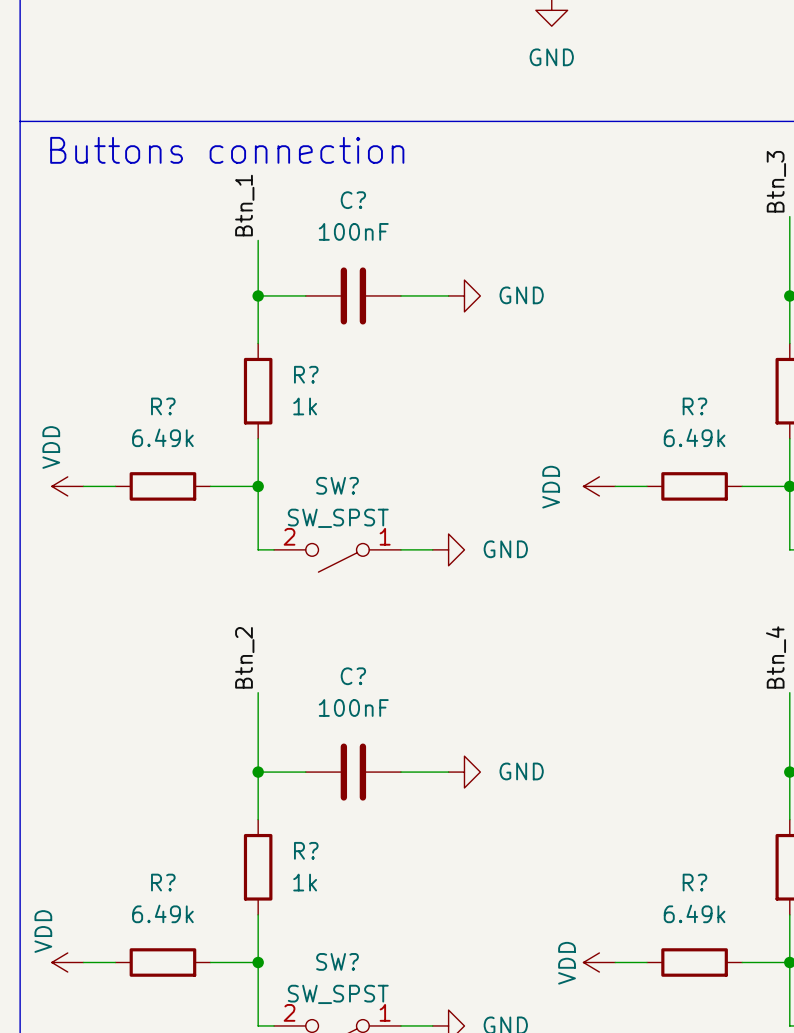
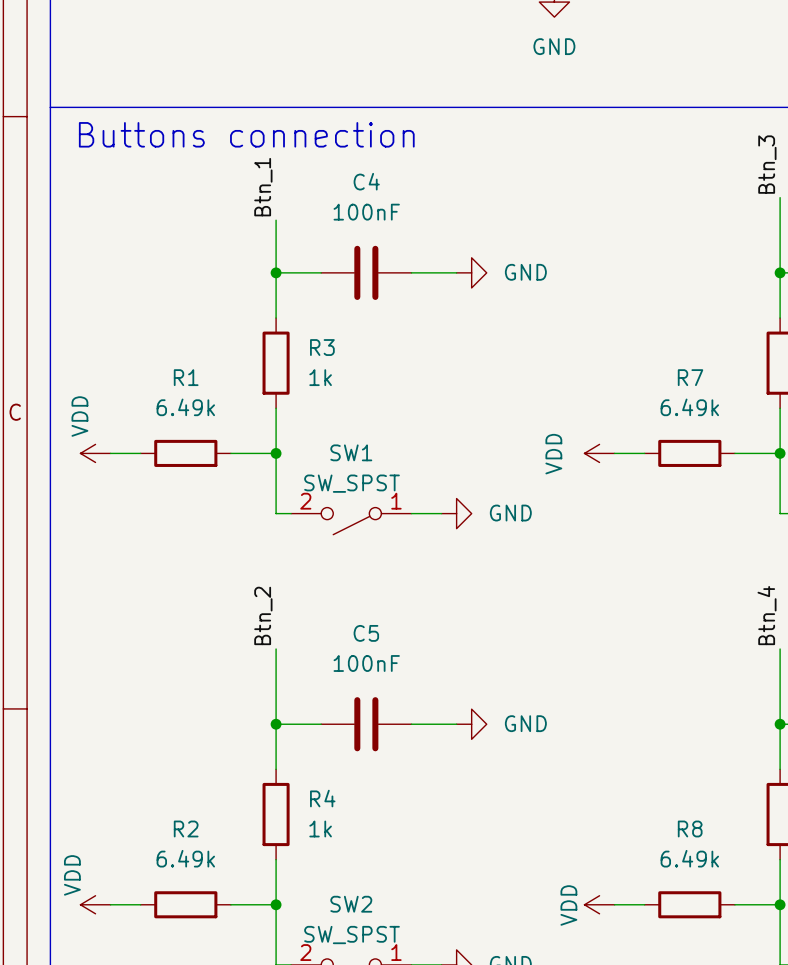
C? name: C? (353, 200) -> C4 (366, 181)
R? name: R? (306, 374) -> R3 (322, 347)
R? name: R? (163, 406) -> R1 (186, 377)
R? name: R? (694, 406) -> R7 (690, 377)
SW? name: SW? (337, 485) -> SW1 (351, 452)
C? name: C? (353, 676) -> C5 (366, 633)
R? name: R? (306, 850) -> R4 (322, 798)
R? name: R? (163, 882) -> R2 (186, 828)
R? name: R? (694, 882) -> R8 (690, 828)
SW? name: SW? (337, 961) -> SW2 (351, 904)

